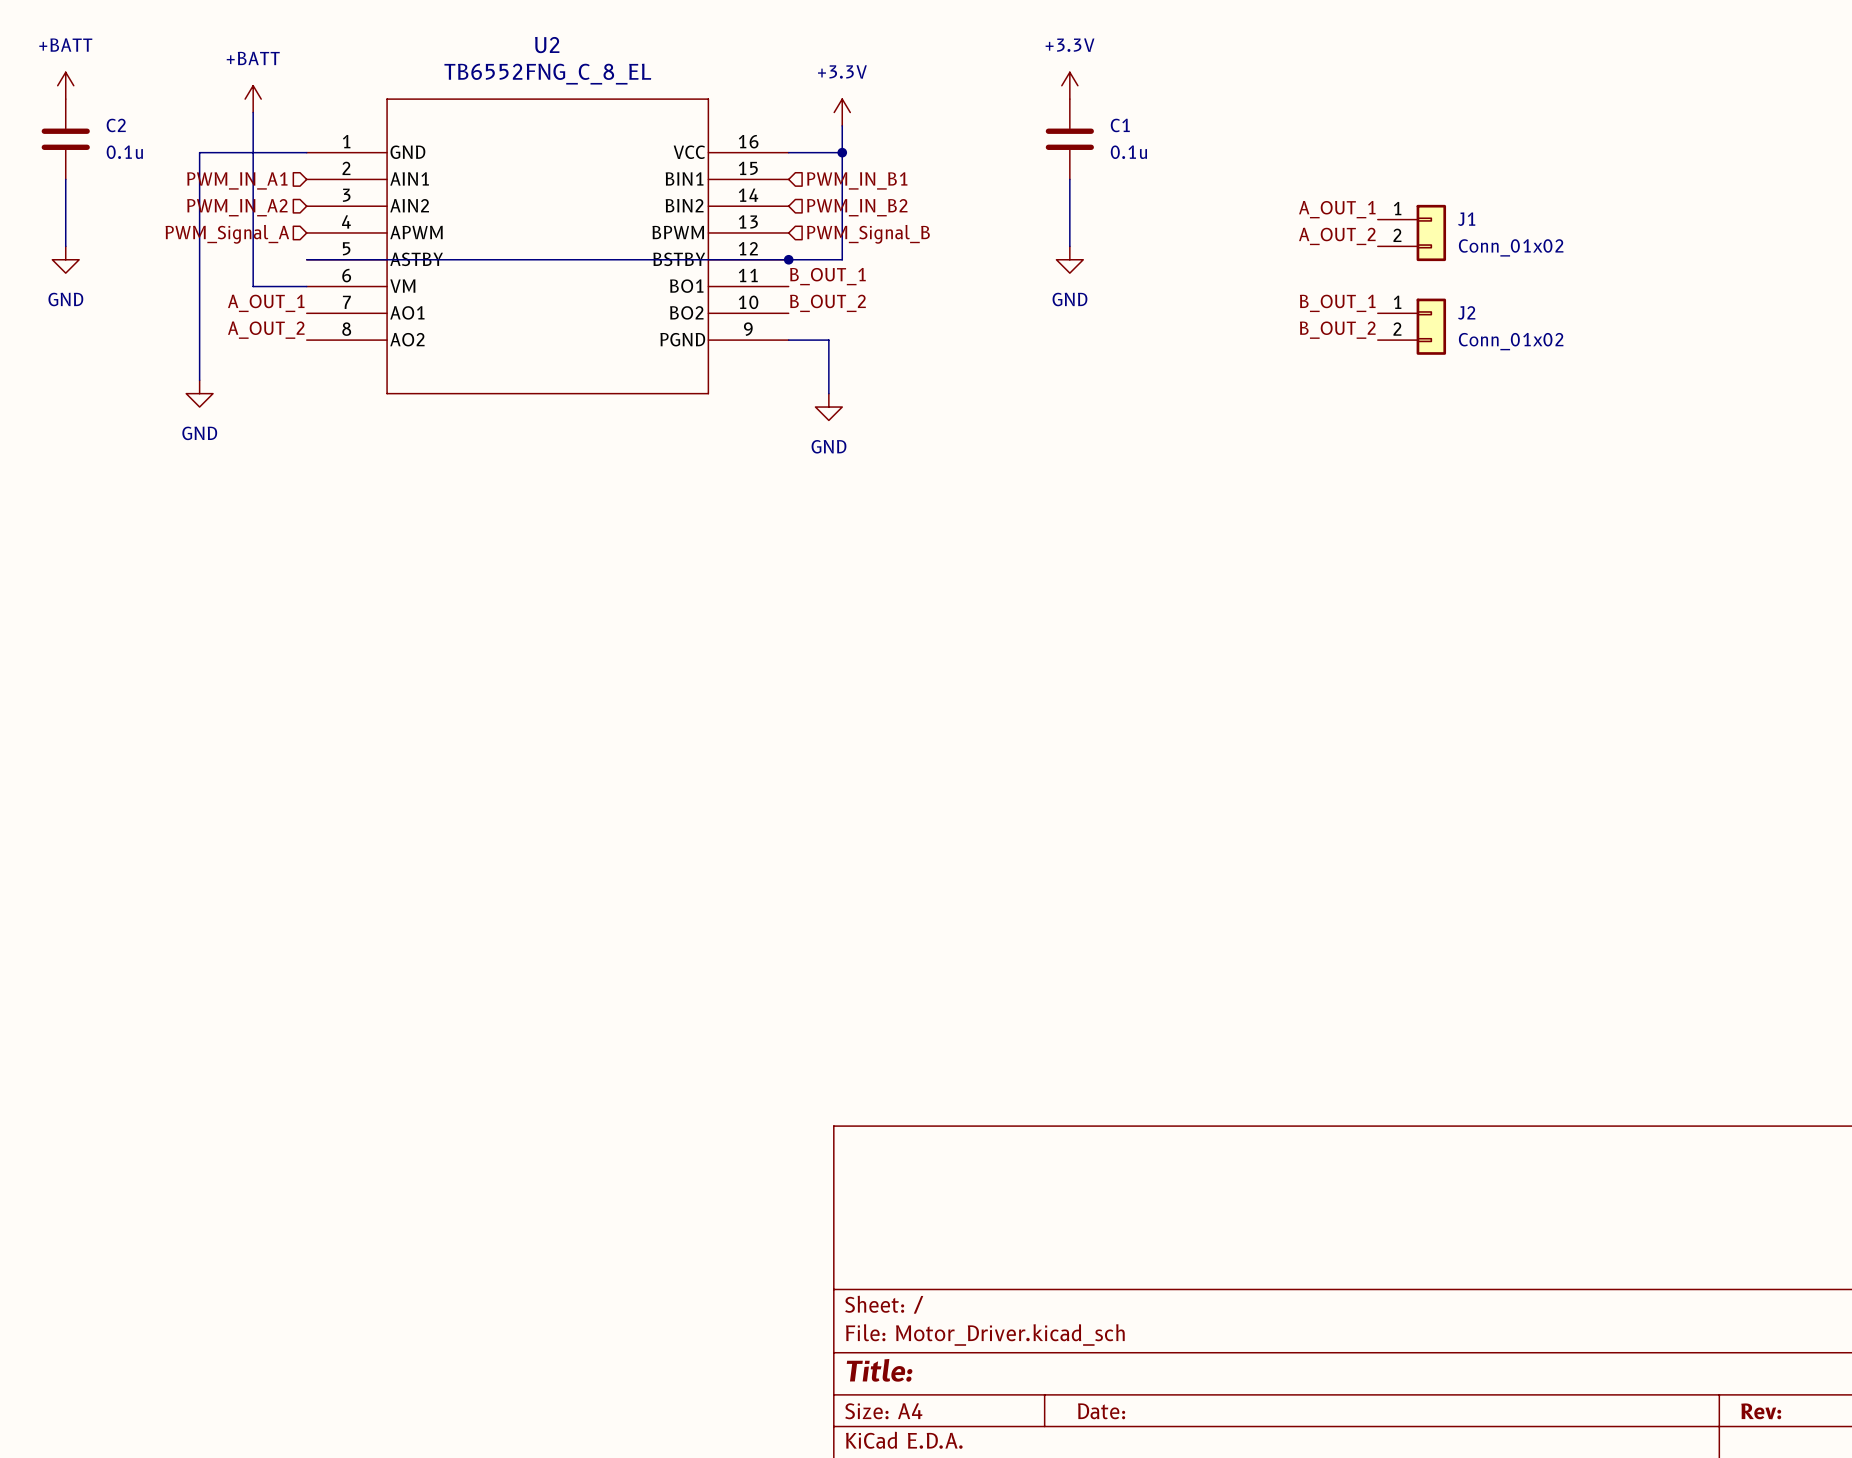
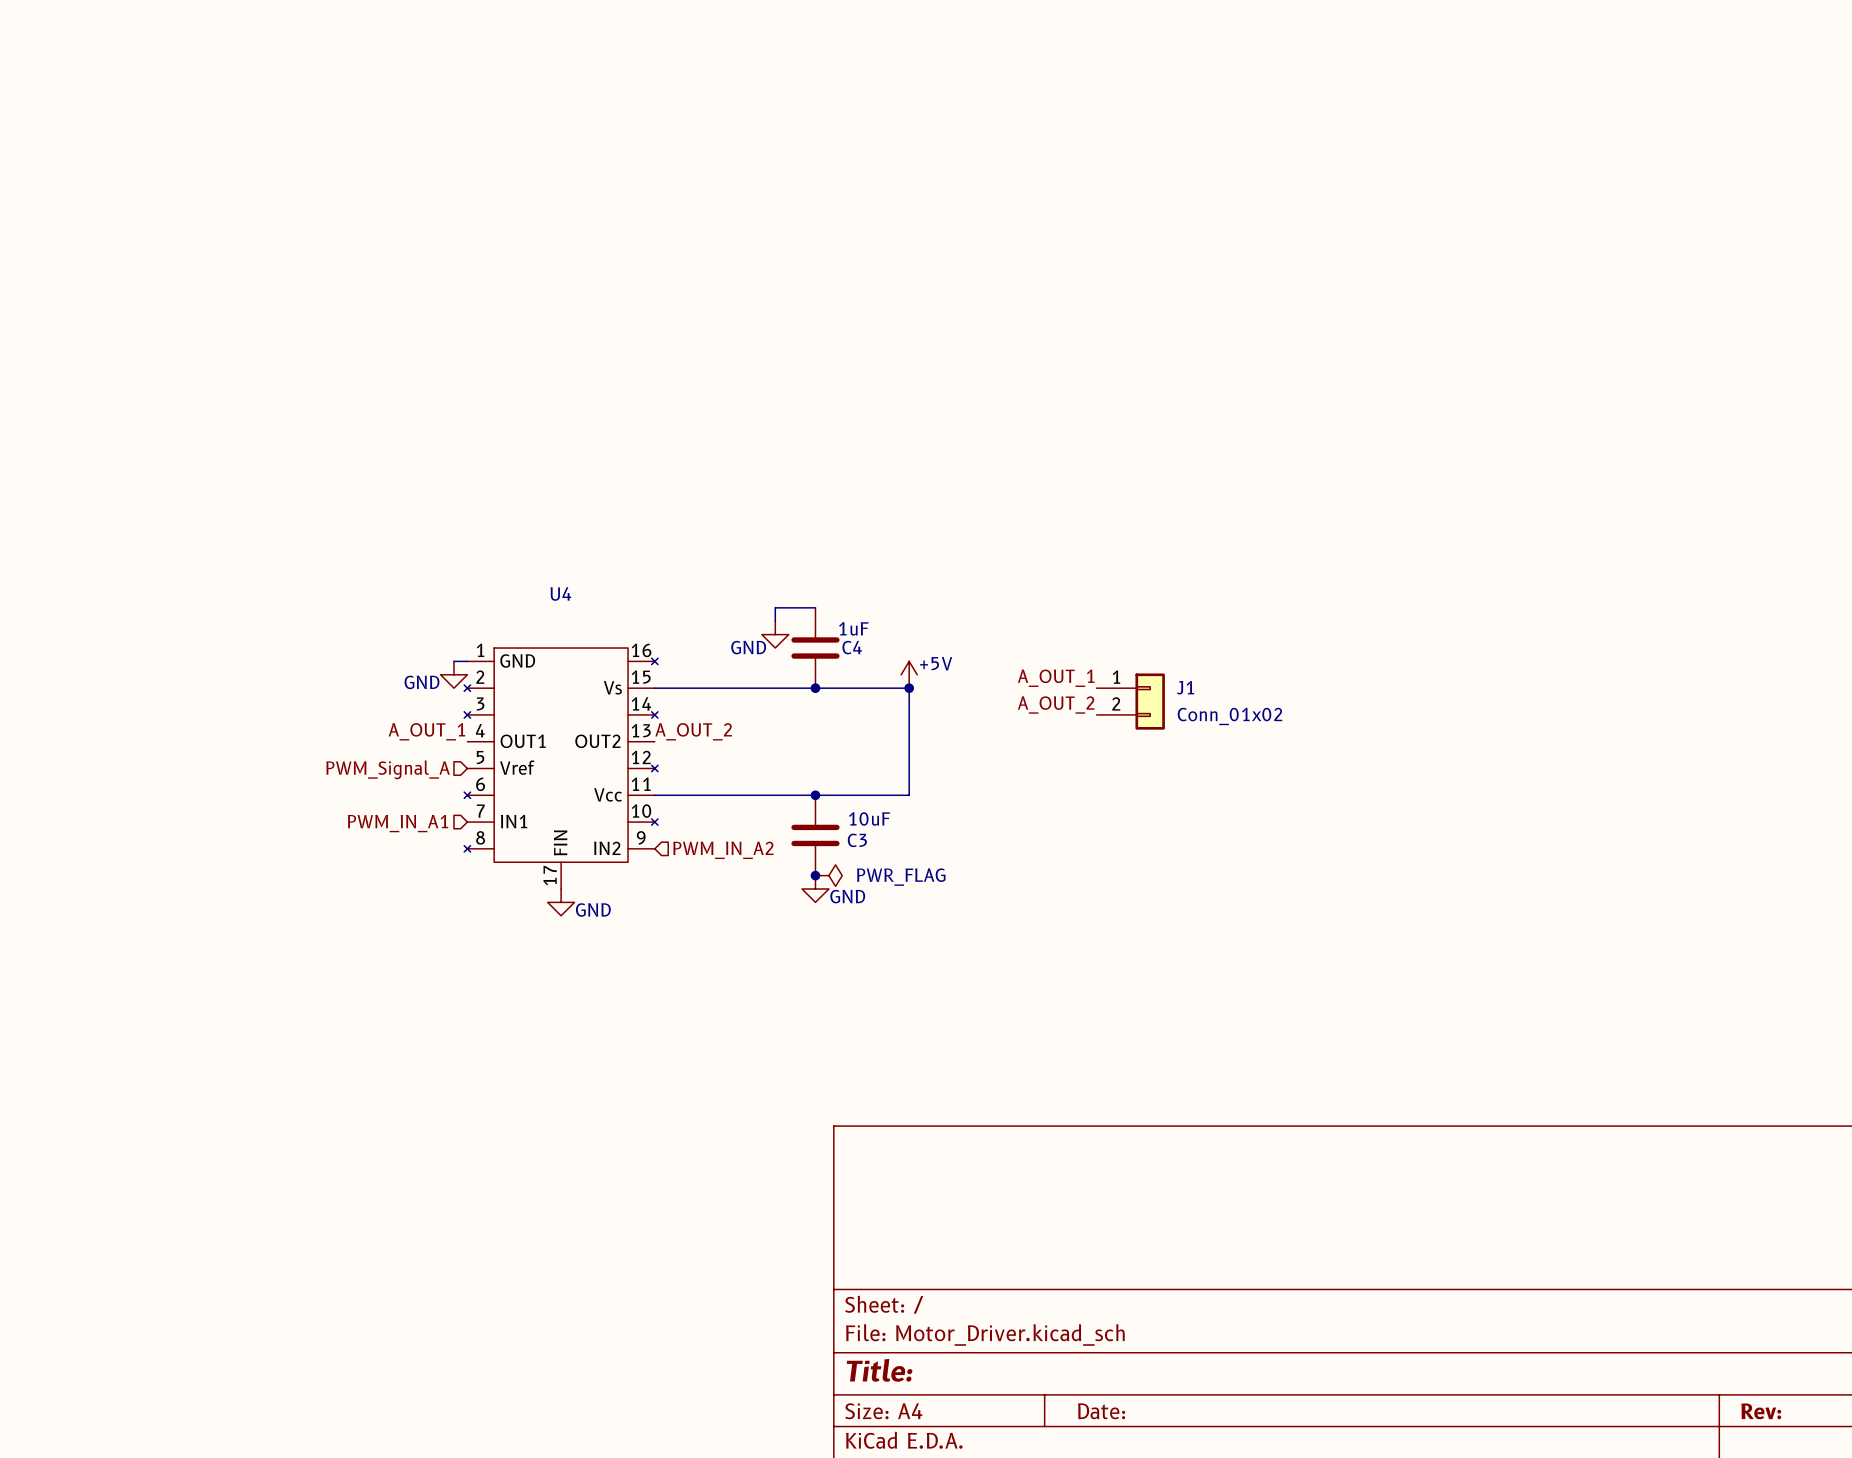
power symbol: +BATT (65, 85) -> none
power symbol: +3.3V (1069, 85) -> none
power symbol: +BATT (253, 99) -> none
wire: (253, 112) (253, 286) (306, 286) -> none
power symbol: +3.3V (842, 112) -> none
wire: (842, 125) (842, 259) (306, 259) -> none
C2: 0.1u (65, 139) -> none
C1: 0.1u (1069, 139) -> none
wire: (306, 152) (199, 152) (199, 380) -> none
wire: (788, 152) (842, 152) -> none
junction: (842, 152) -> none
wire: (65, 179) (65, 246) -> none
wire: (1069, 179) (1069, 246) -> none
hierarchical label: PWM_IN_A1 (237, 180) -> none
hierarchical label: PWM_IN_B1 (857, 180) -> none
hierarchical label: PWM_IN_A2 (237, 207) -> none
hierarchical label: PWM_IN_B2 (857, 207) -> none
label: A_OUT_1 (1337, 209) -> none
J1 position: (1411, 232) -> (1130, 701)
hierarchical label: PWM_Signal_A (227, 234) -> none
hierarchical label: PWM_Signal_B (868, 234) -> none
label: A_OUT_2 (1337, 236) -> none
U2: TB6552FNG_C_8_EL (547, 246) -> none
power symbol: GND (65, 259) -> none
junction: (788, 259) -> none
power symbol: GND (1069, 259) -> none
label: B_OUT_1 (827, 276) -> none
label: A_OUT_1 (266, 303) -> none
label: B_OUT_2 (827, 303) -> none
label: B_OUT_1 (1337, 303) -> none
J2: Conn_01x02 (1411, 326) -> none
label: A_OUT_2 (266, 330) -> none
label: B_OUT_2 (1337, 330) -> none
wire: (788, 340) (828, 340) (828, 393) -> none
power symbol: GND (199, 393) -> none
power symbol: GND (828, 407) -> none
wire: none -> (815, 607) (775, 607) (775, 621)
power symbol: none -> GND (775, 634)
C4: none -> 1uF (815, 648)
wire: none -> (453, 661) (467, 661)
power symbol: none -> GND (453, 674)
power symbol: none -> +5V (909, 674)
label: none -> A_OUT_1 (1056, 678)
wire: none -> (654, 688) (909, 688) (909, 795) (654, 795)
junction: none -> (815, 688)
junction: none -> (909, 688)
label: none -> A_OUT_2 (1056, 705)
label: none -> A_OUT_1 (426, 731)
label: none -> A_OUT_2 (693, 731)
U4: none -> (561, 768)
hierarchical label: none -> PWM_Signal_A (388, 769)
junction: none -> (815, 795)
hierarchical label: none -> PWM_IN_A1 (397, 823)
C3: none -> 10uF (815, 835)
hierarchical label: none -> PWM_IN_A2 (723, 850)
junction: none -> (815, 875)
power symbol: none -> PWR_FLAG (828, 875)
power symbol: none -> GND (815, 889)
power symbol: none -> GND (561, 902)

